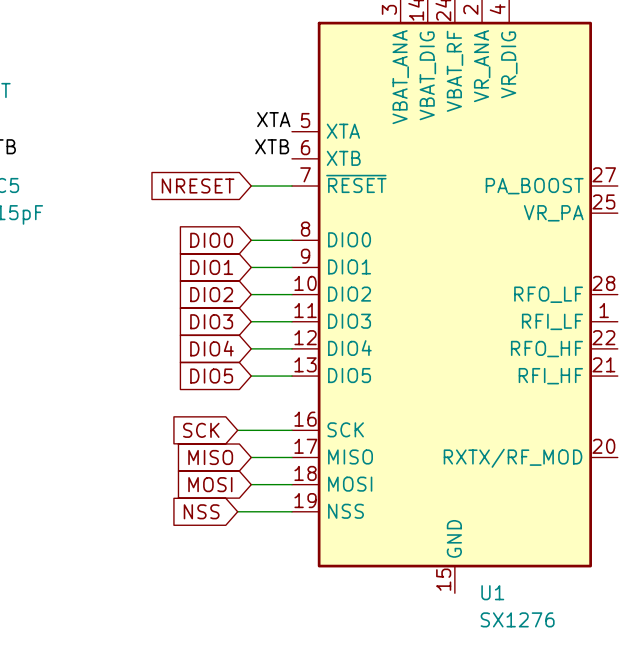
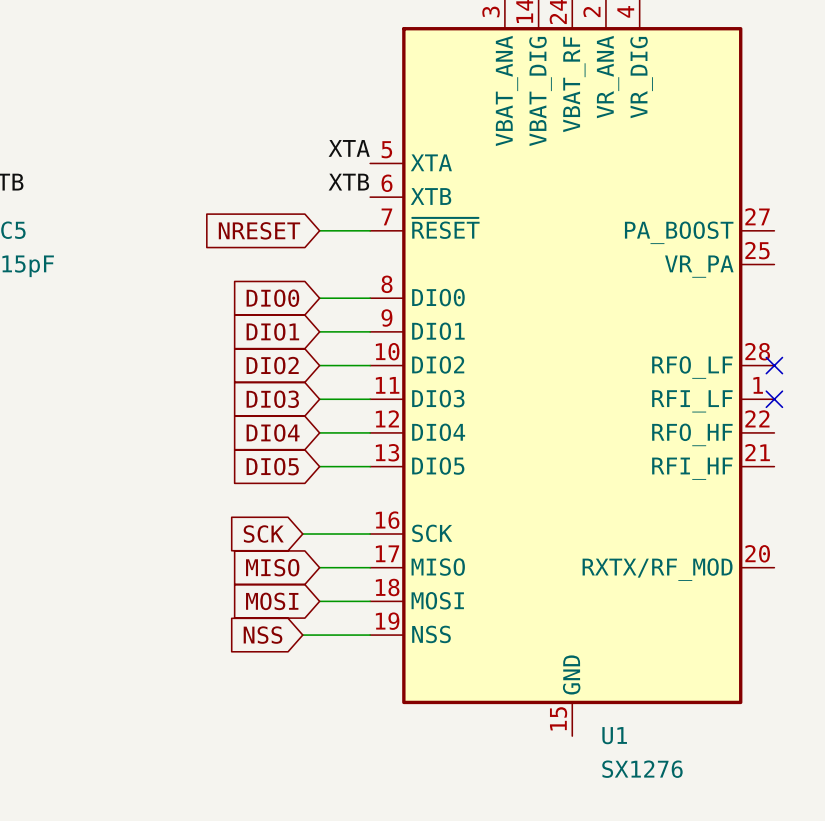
no-connect mark: none -> (774, 365)
no-connect mark: none -> (774, 399)

